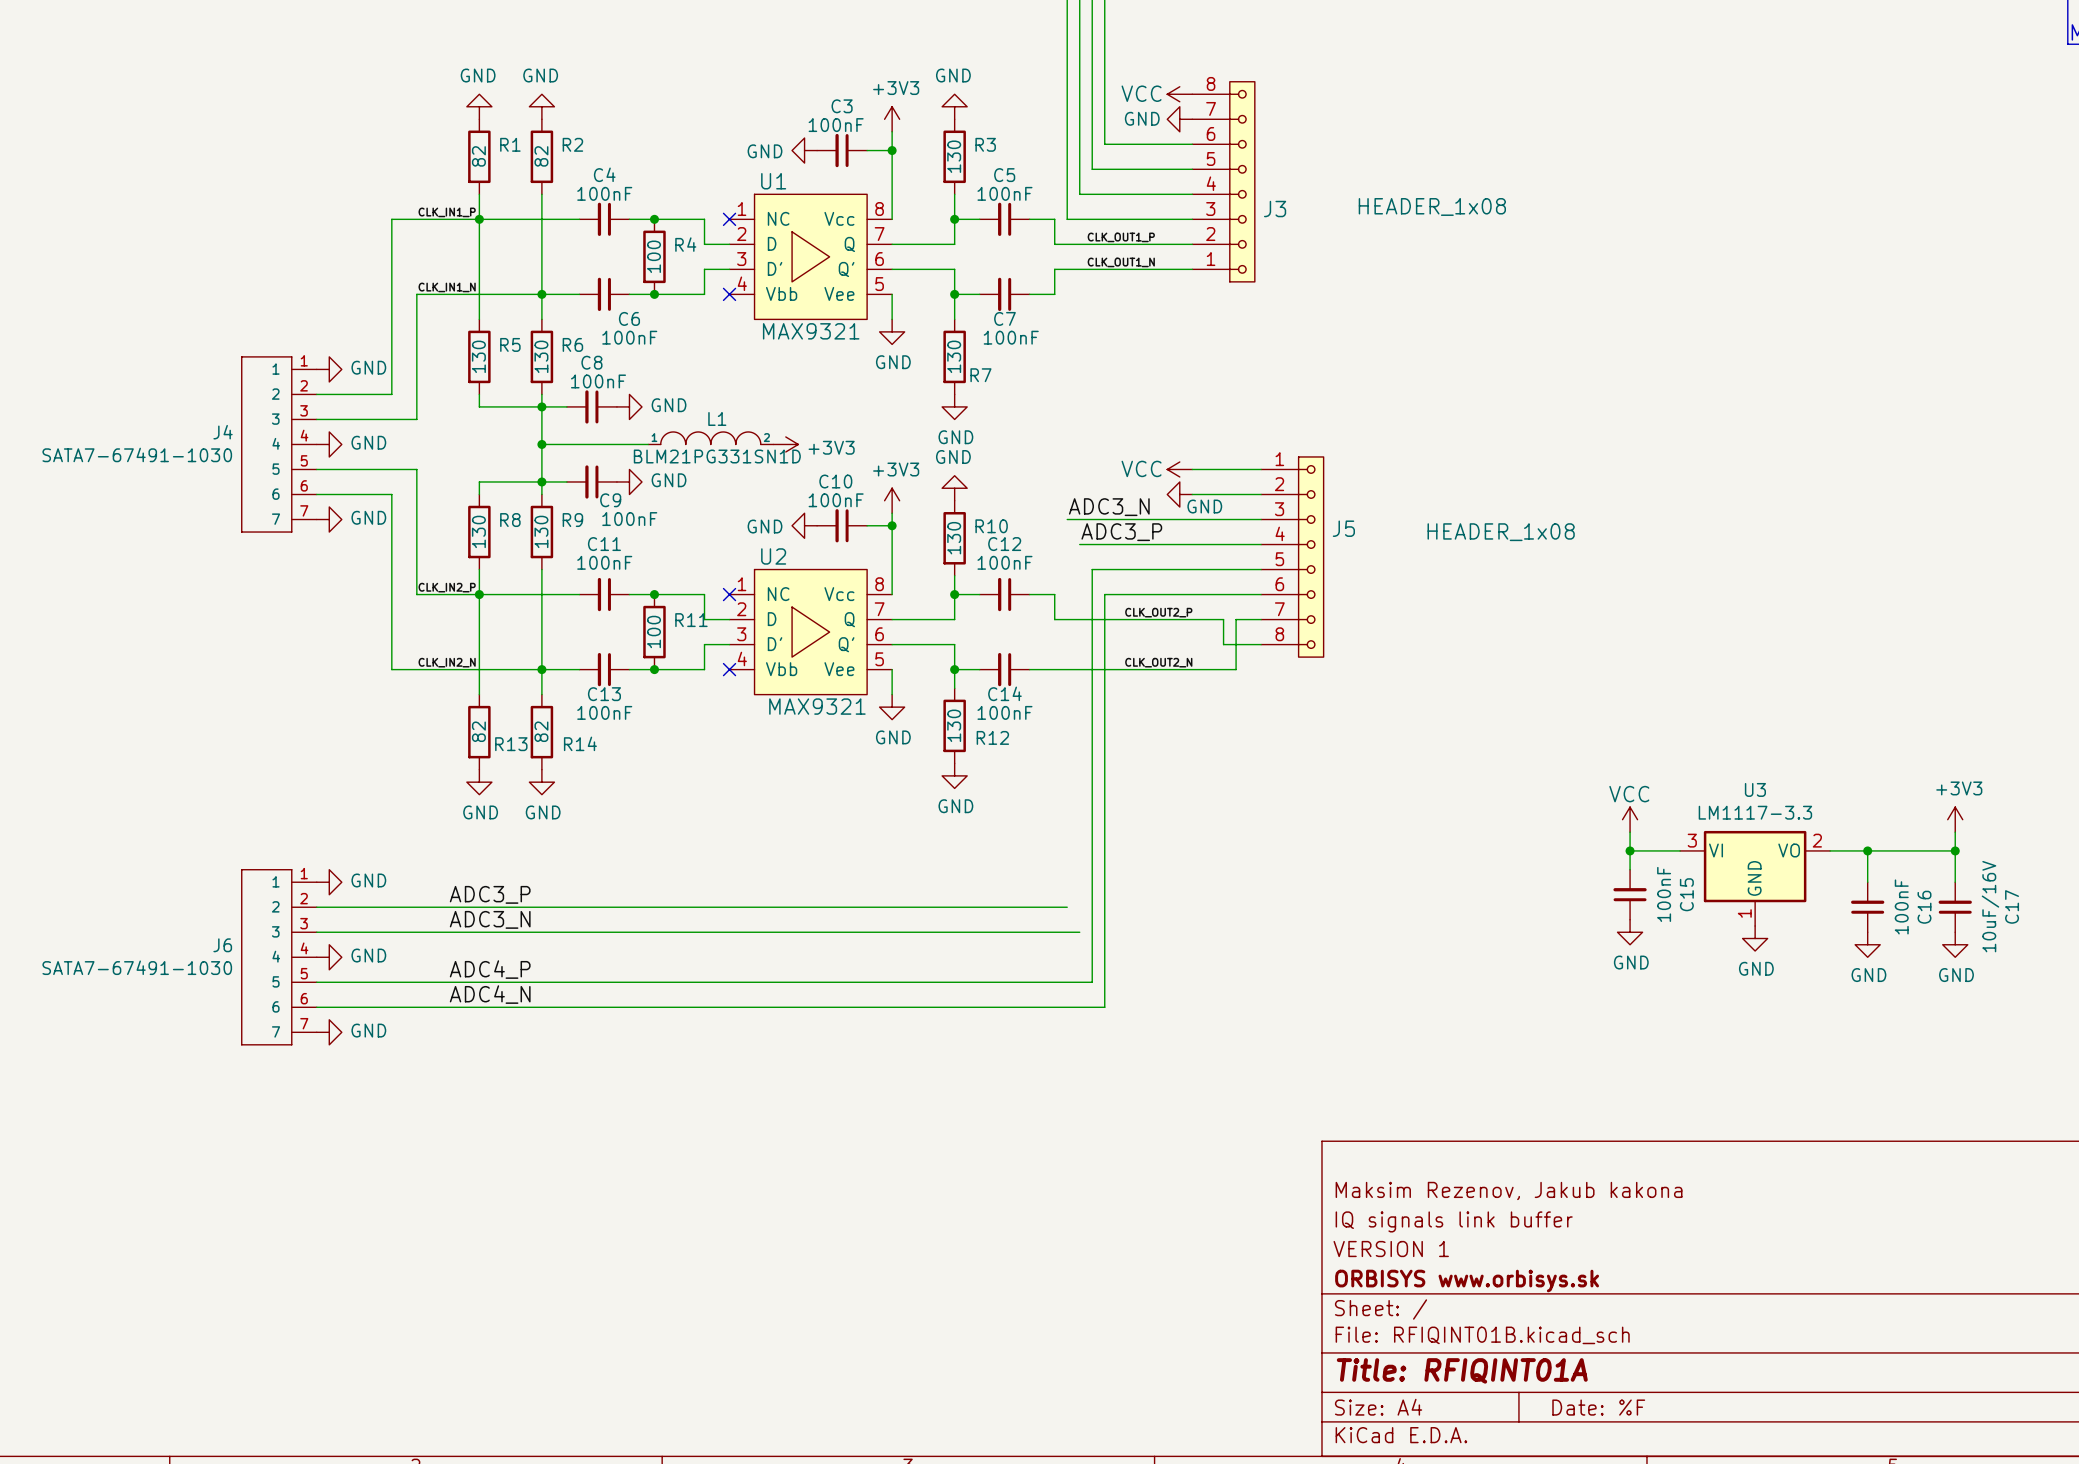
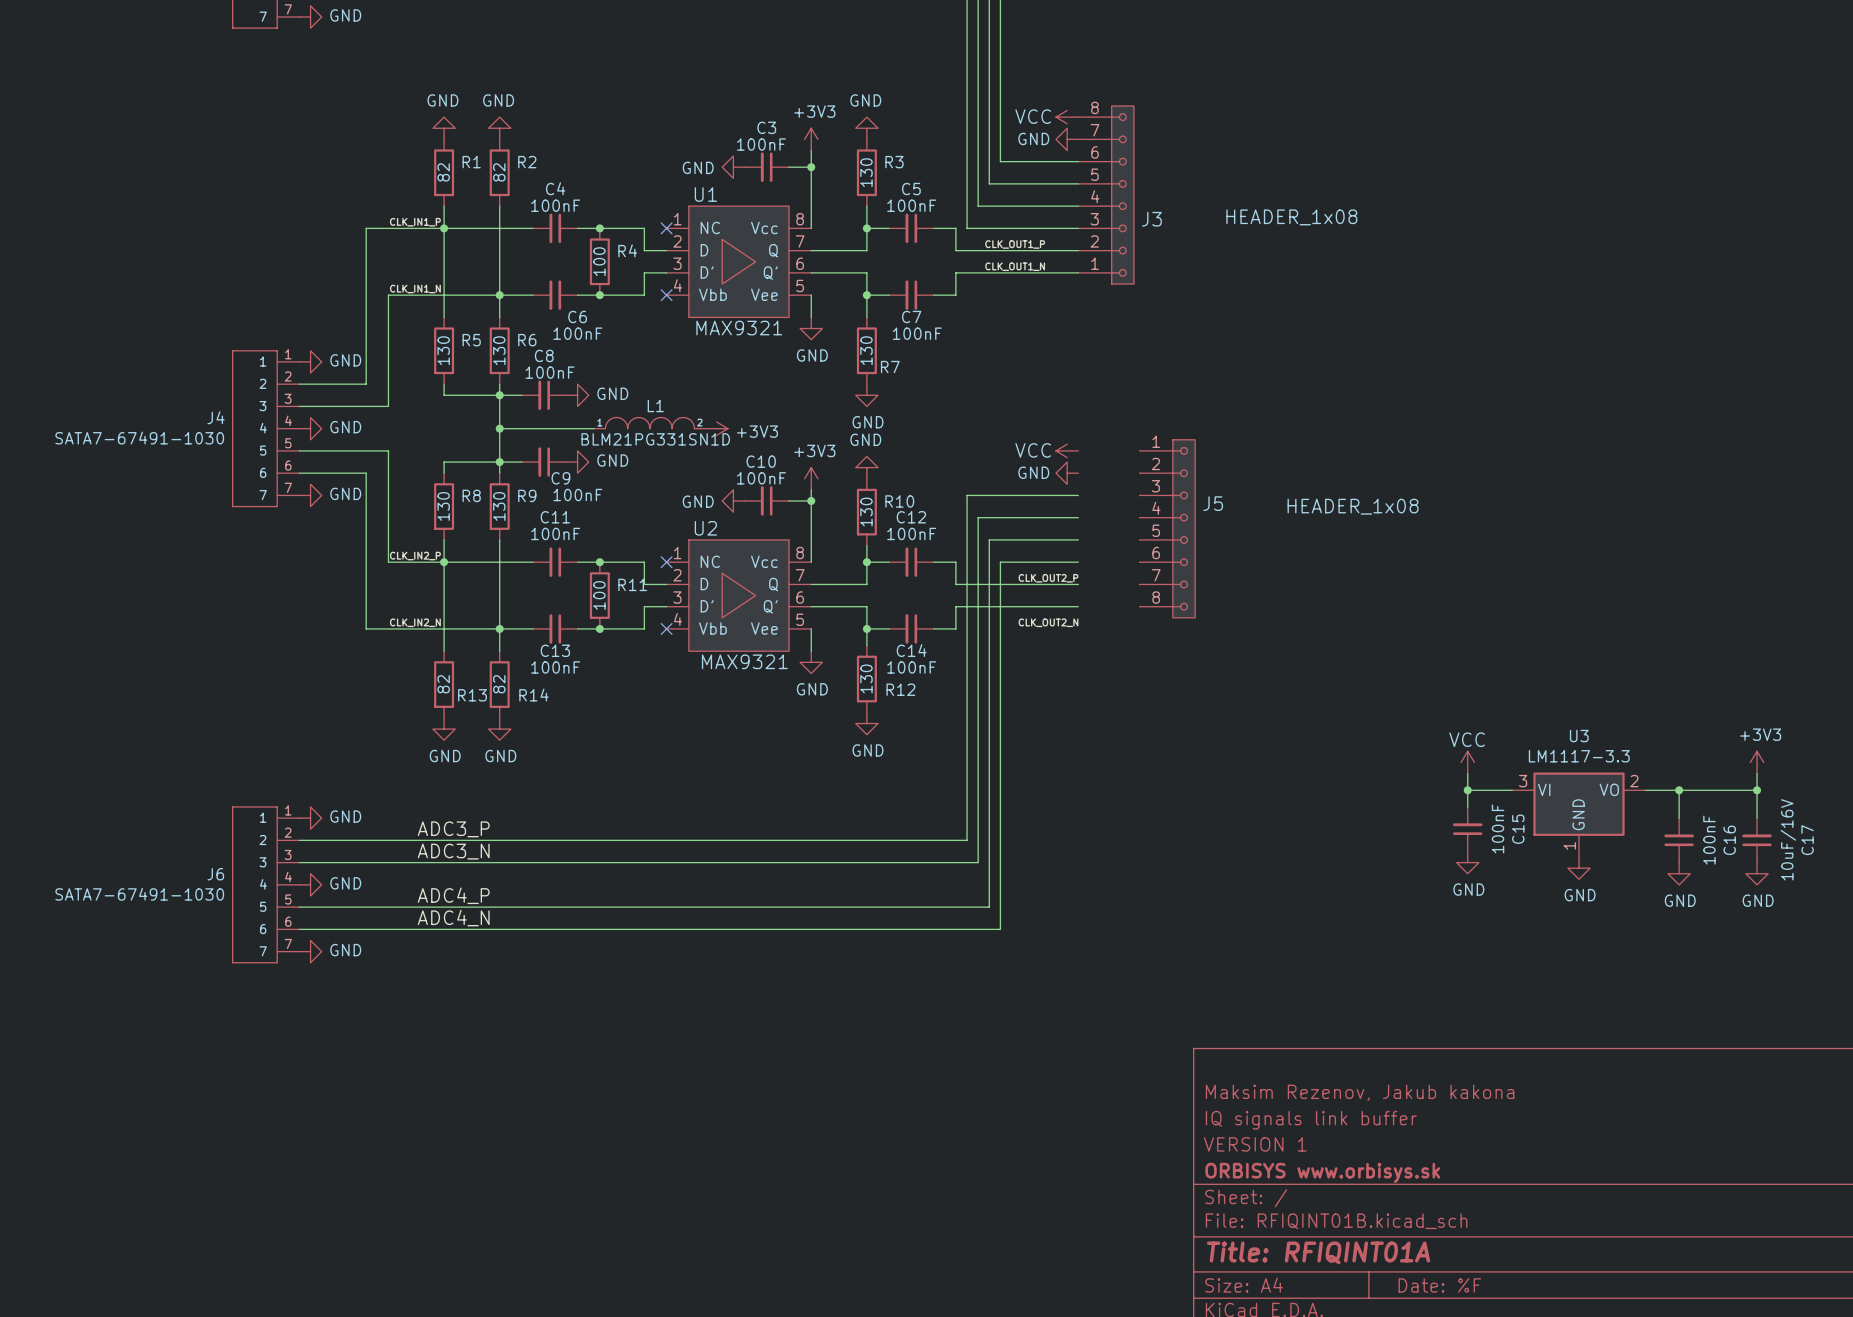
wire: (1192, 469) (1261, 469) -> none
wire: (1192, 494) (1261, 494) -> none
power symbol text position: GND (1204, 506) -> GND (1033, 472)
label: ADC3_N (1109, 507) -> none
wire: none -> (967, 495) (967, 840)
wire: (1192, 519) (1261, 519) -> none
label: ADC3_P (1121, 532) -> none
wire: none -> (978, 517) (978, 862)
wire: (1192, 544) (1261, 544) -> none
wire: (1192, 569) (1261, 569) -> none
wire: (1192, 594) (1261, 594) -> none
wire: (1192, 619) (1223, 619) (1223, 644) (1261, 644) -> none
wire: (1261, 619) (1236, 619) (1236, 669) (1054, 669) -> (1078, 606) (955, 606) (955, 628)

